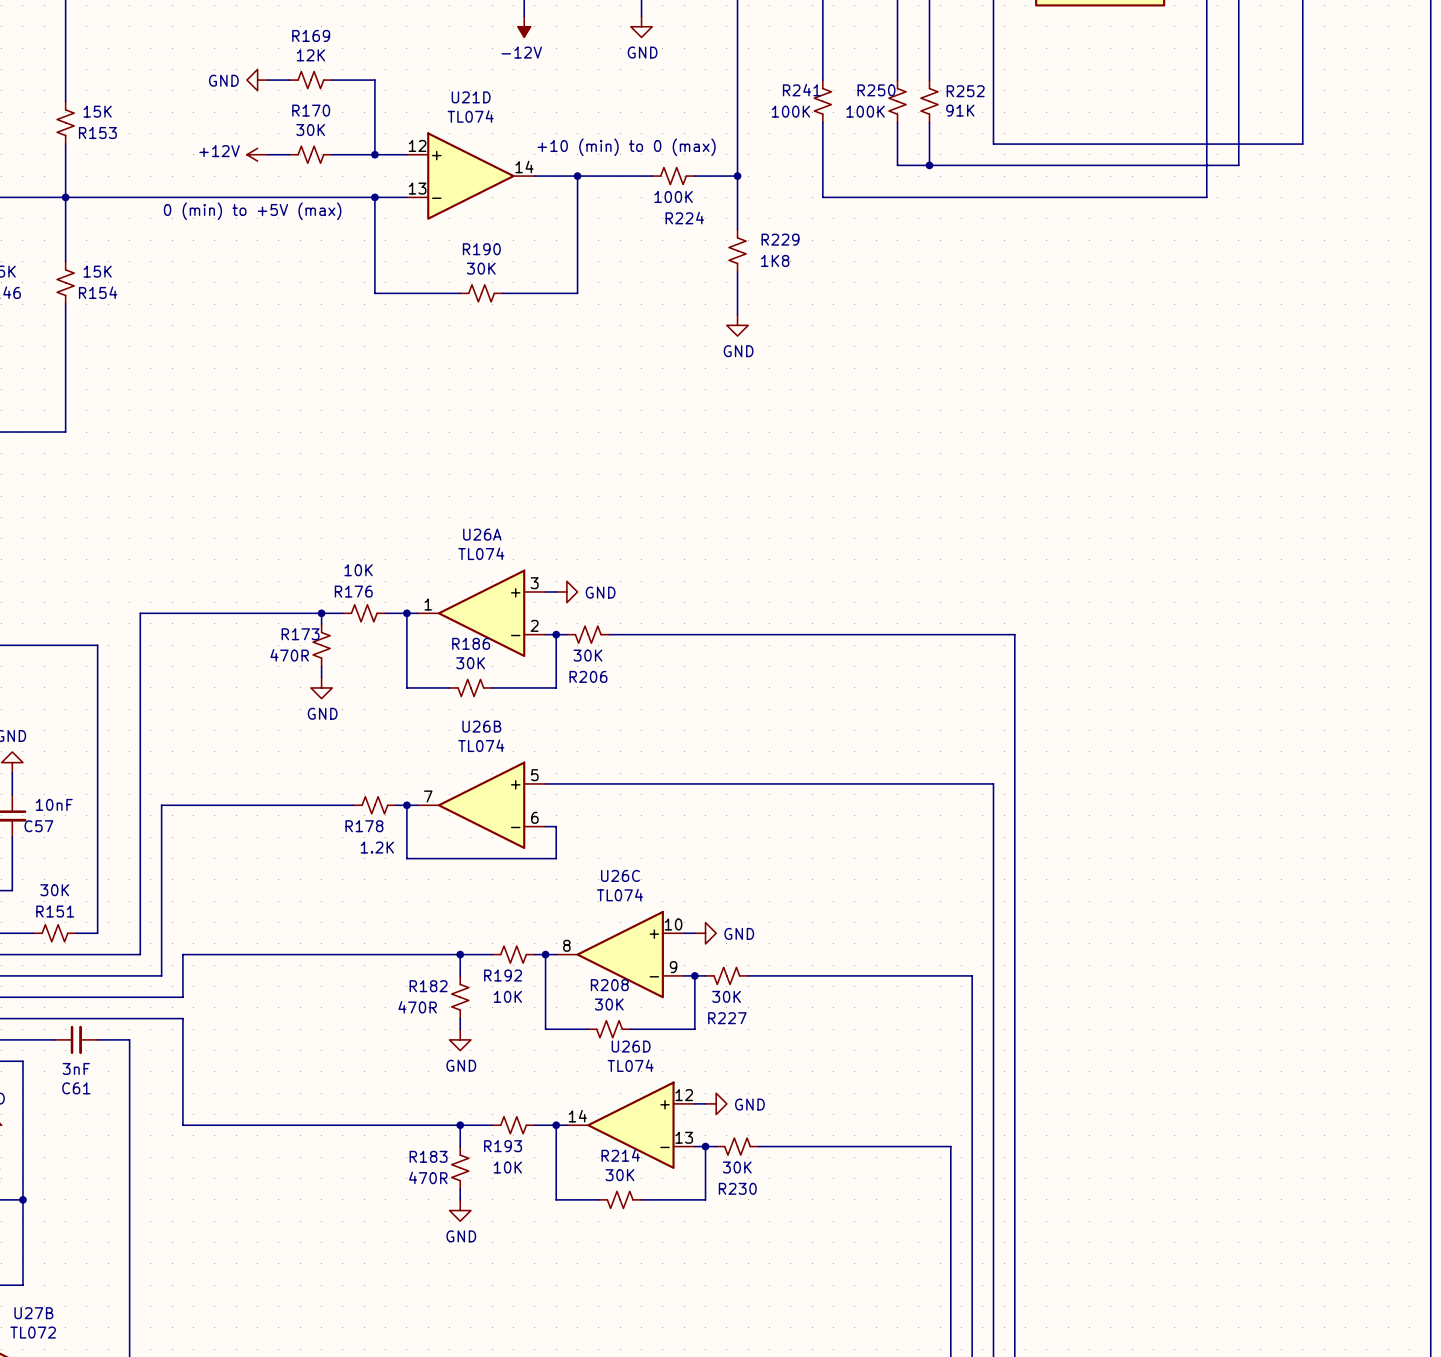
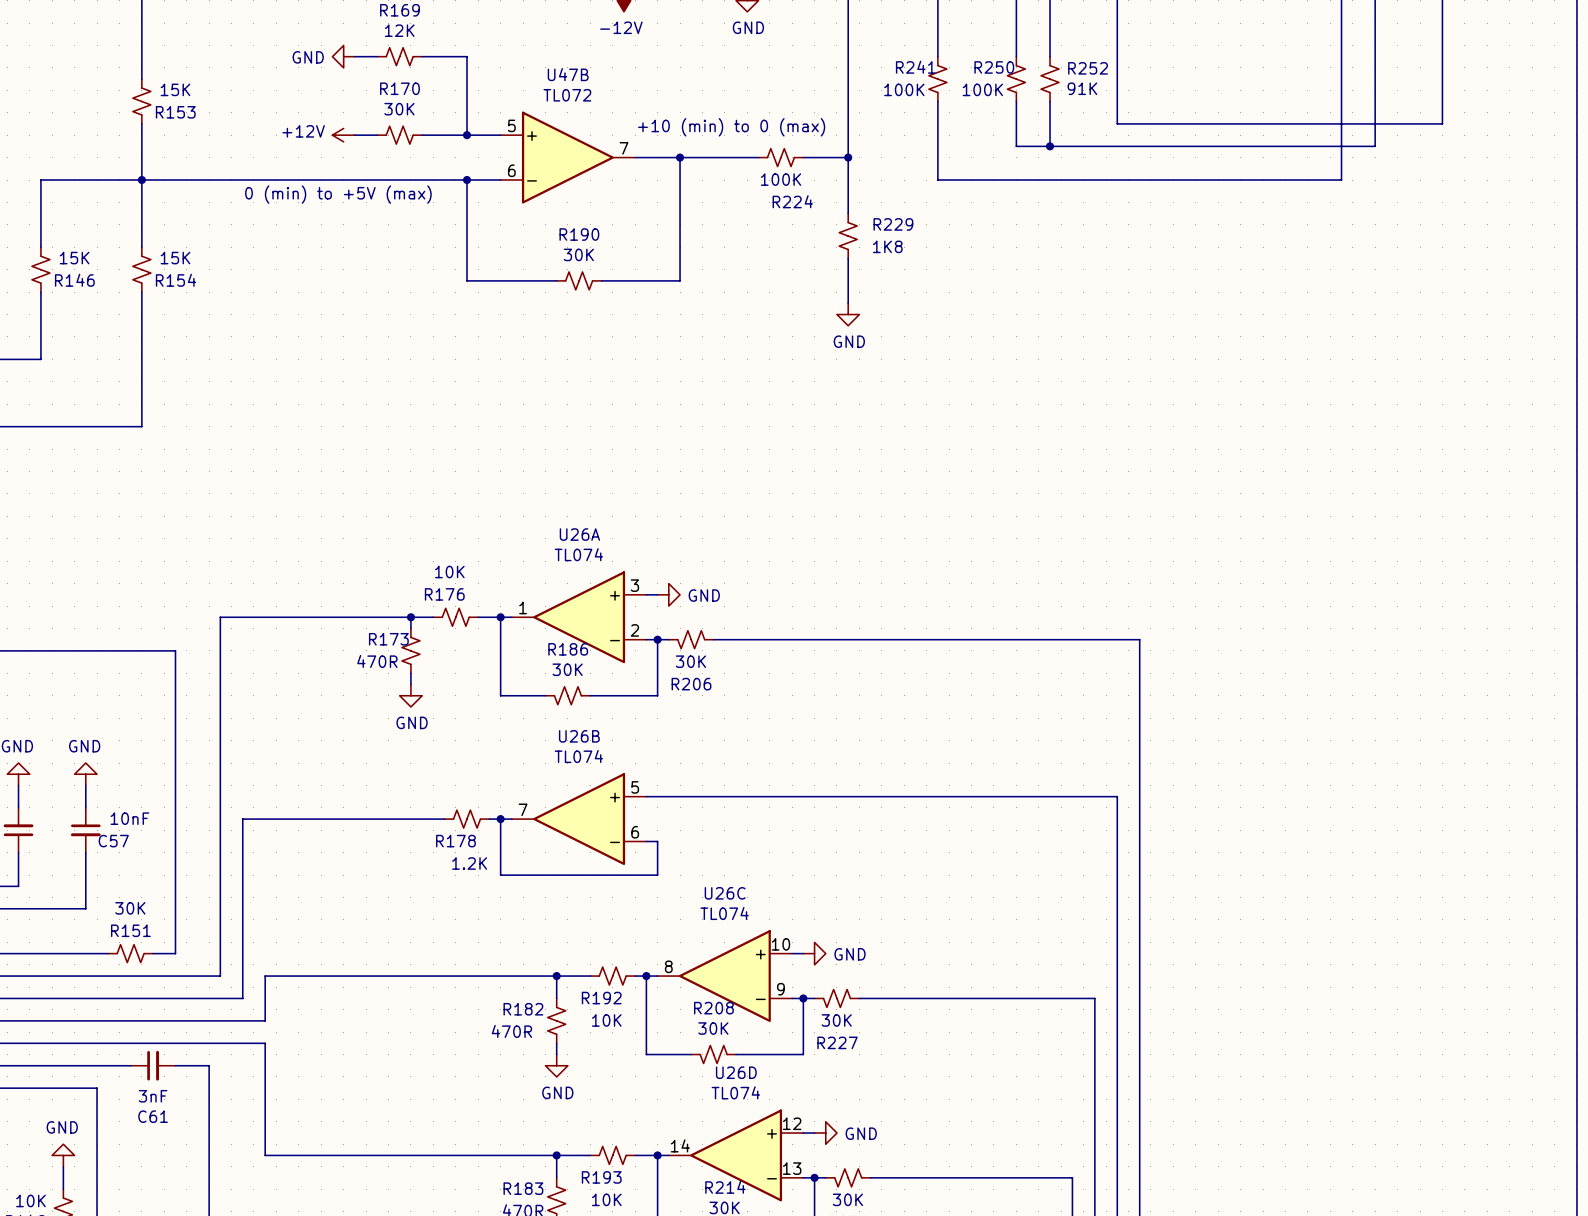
U21D name: U21D (471, 97) -> U47B (568, 74)
U21D value: TL074 (470, 116) -> TL072 (567, 95)
U21D pin number: 12 (417, 145) -> 5 (511, 125)
U21D pin number: 14 (524, 167) -> 7 (623, 148)
U21D pin number: 13 (417, 188) -> 6 (511, 170)

